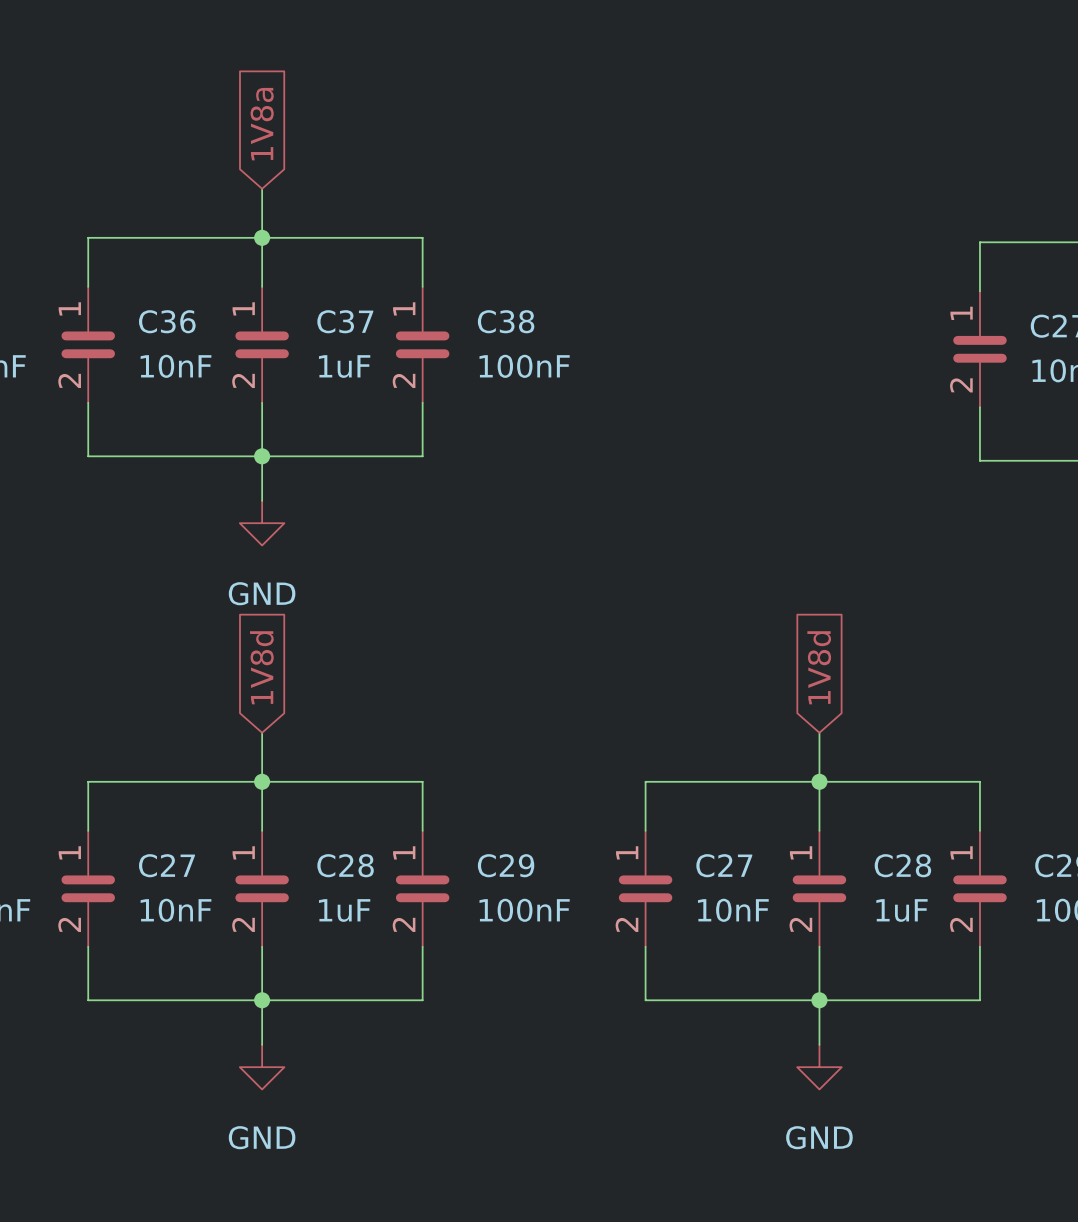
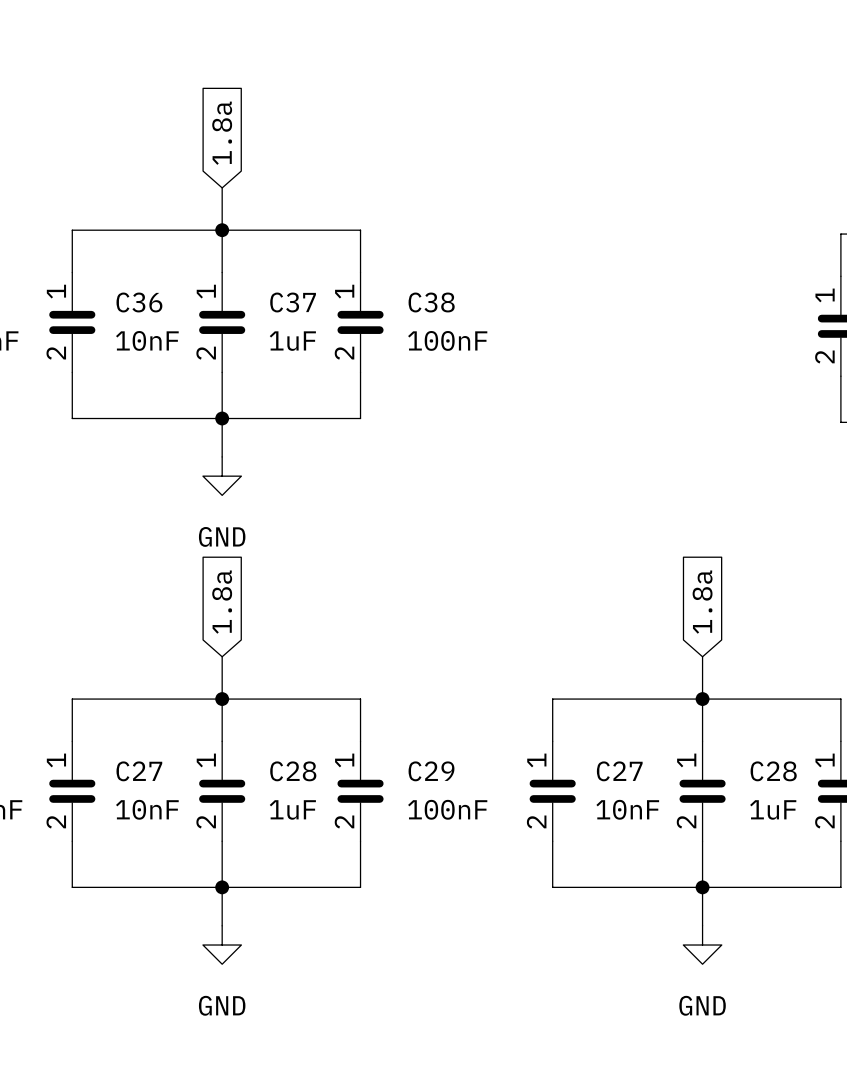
global label: 1V8a (262, 124) -> 1.8a (222, 133)
global label: 1V8d (261, 667) -> 1.8a (222, 602)
global label: 1V8d (819, 667) -> 1.8a (702, 602)

